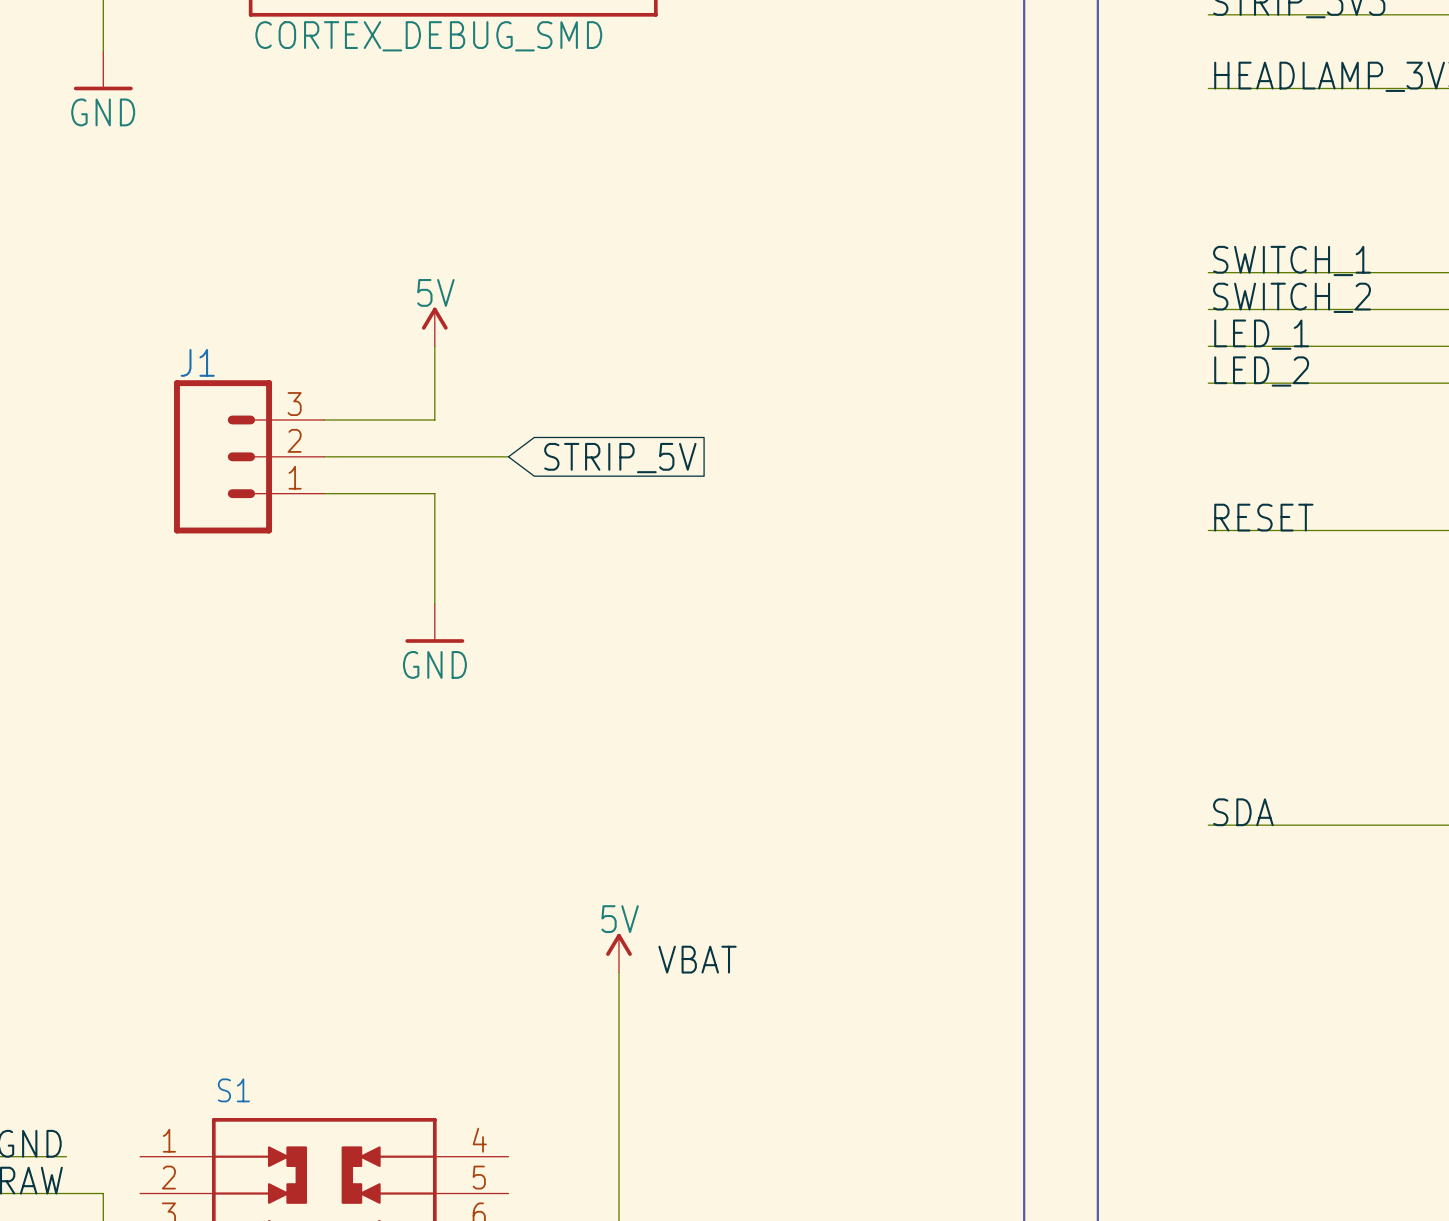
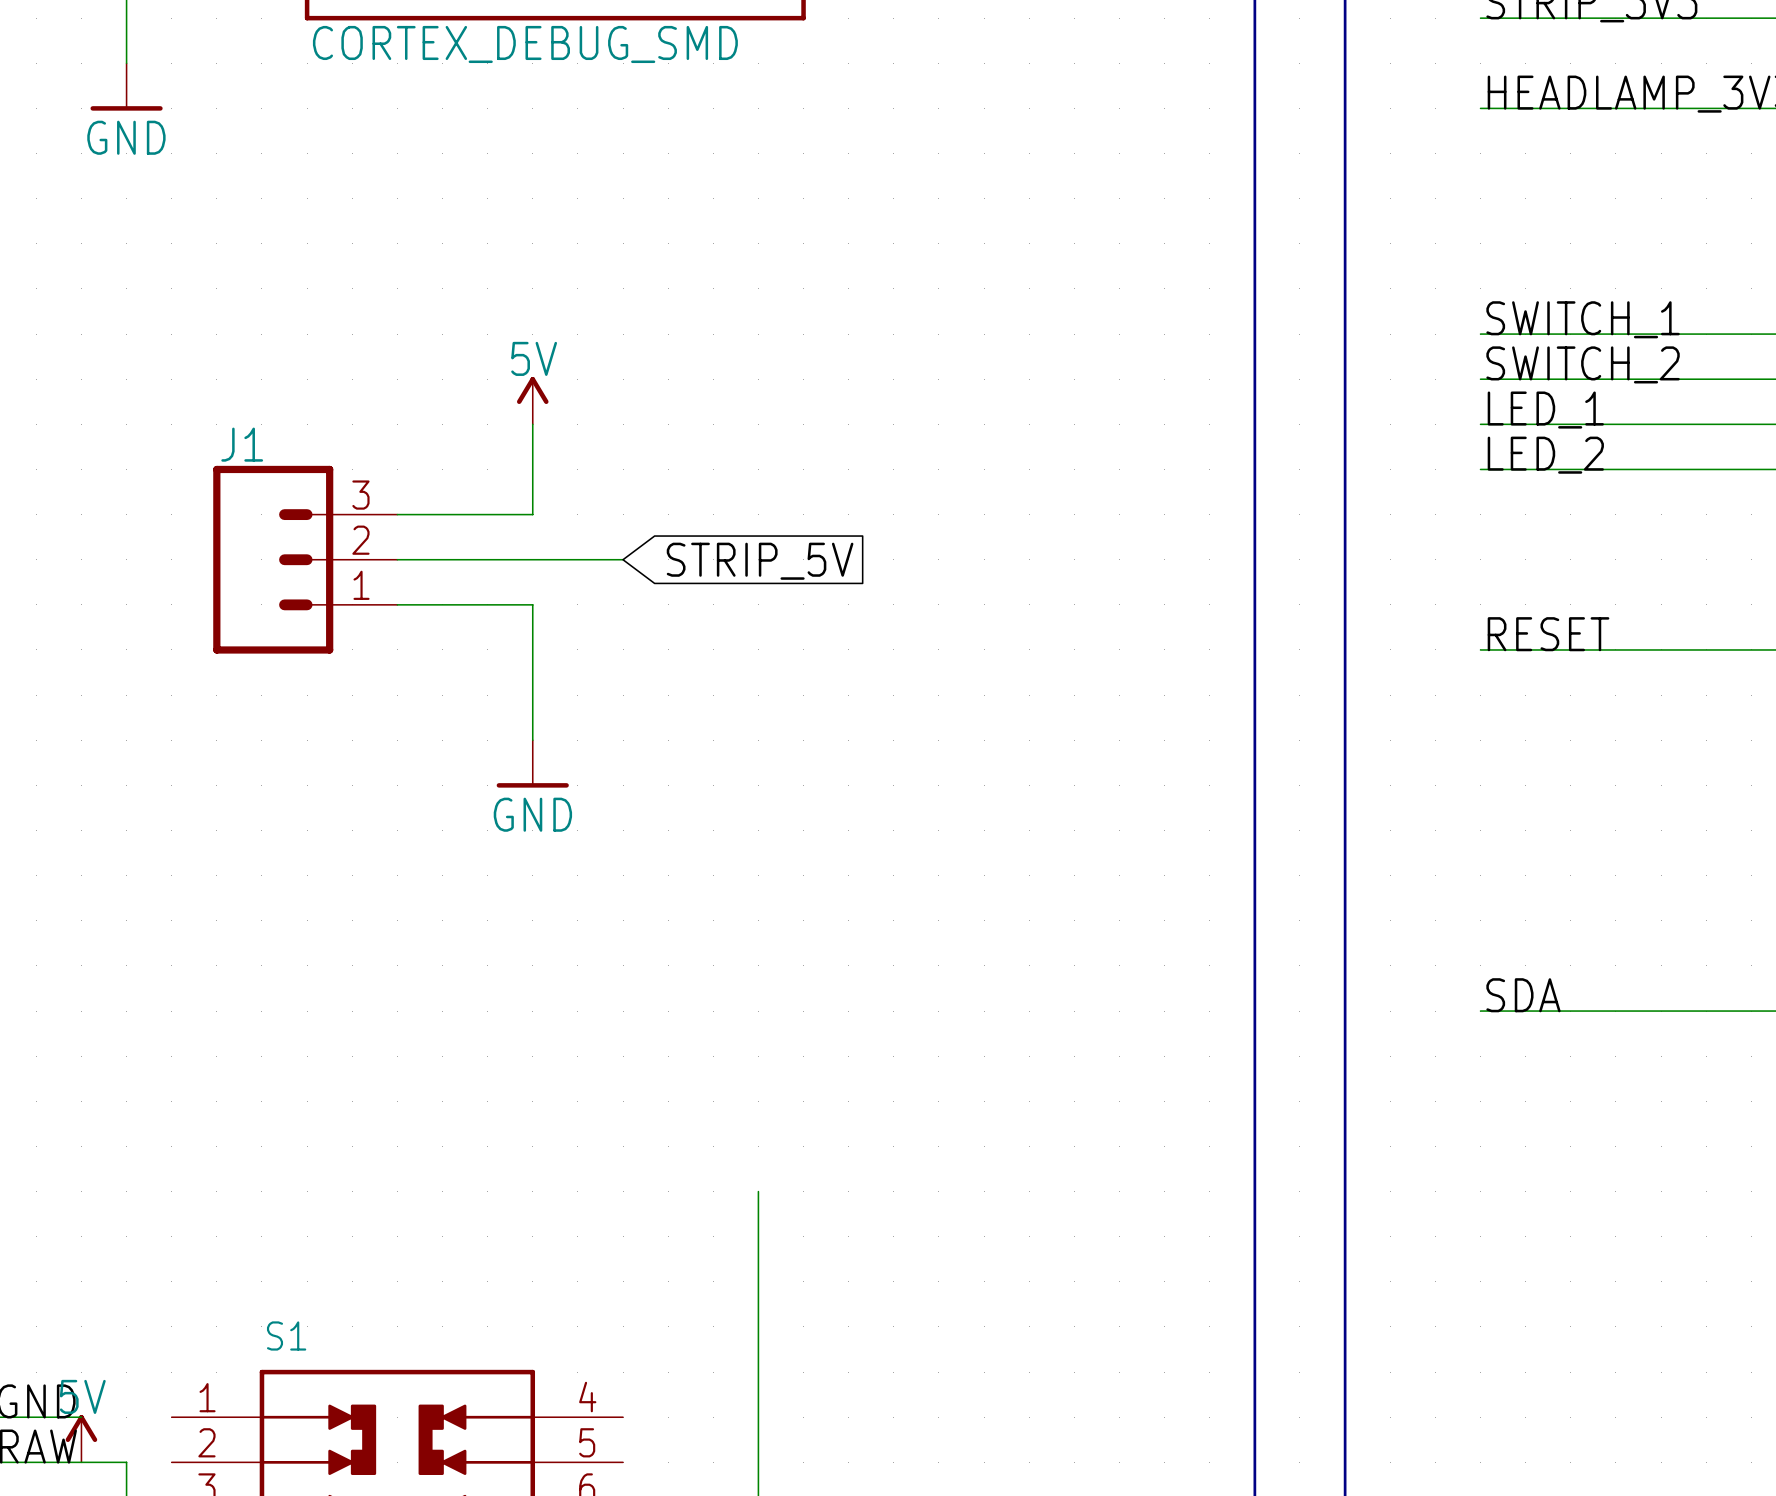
power symbol: 5V (618, 953) -> none
label: VBAT (697, 959) -> none
power symbol: none -> 5V (81, 1438)

